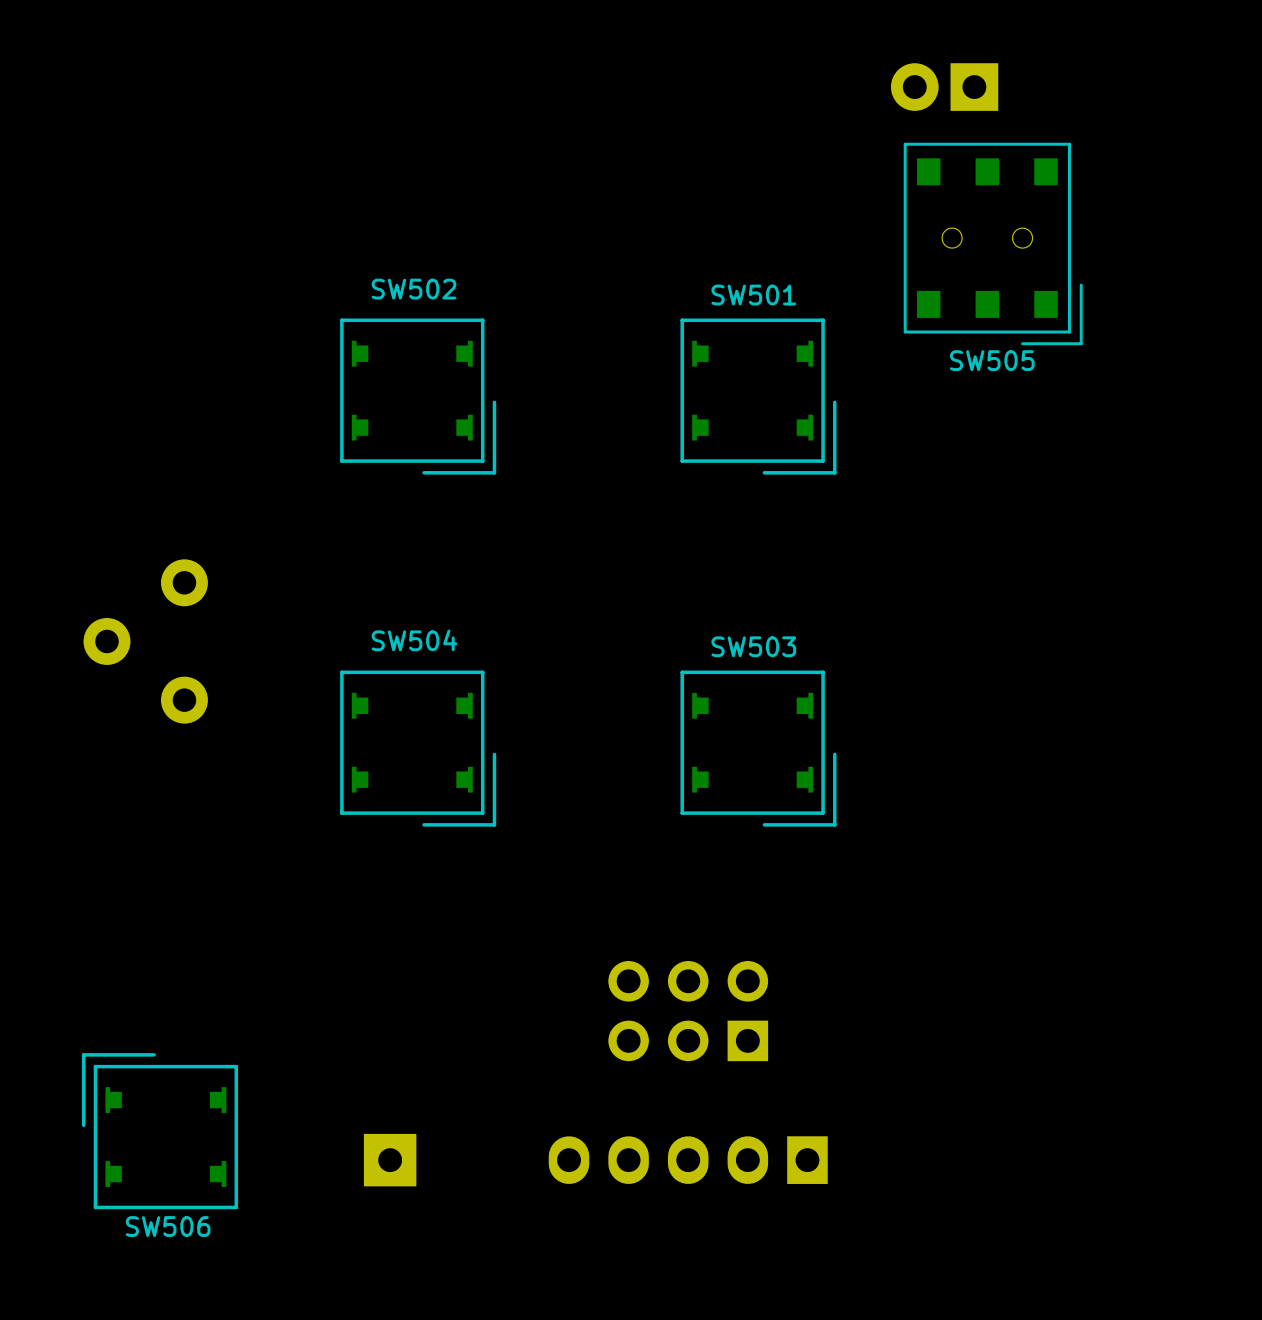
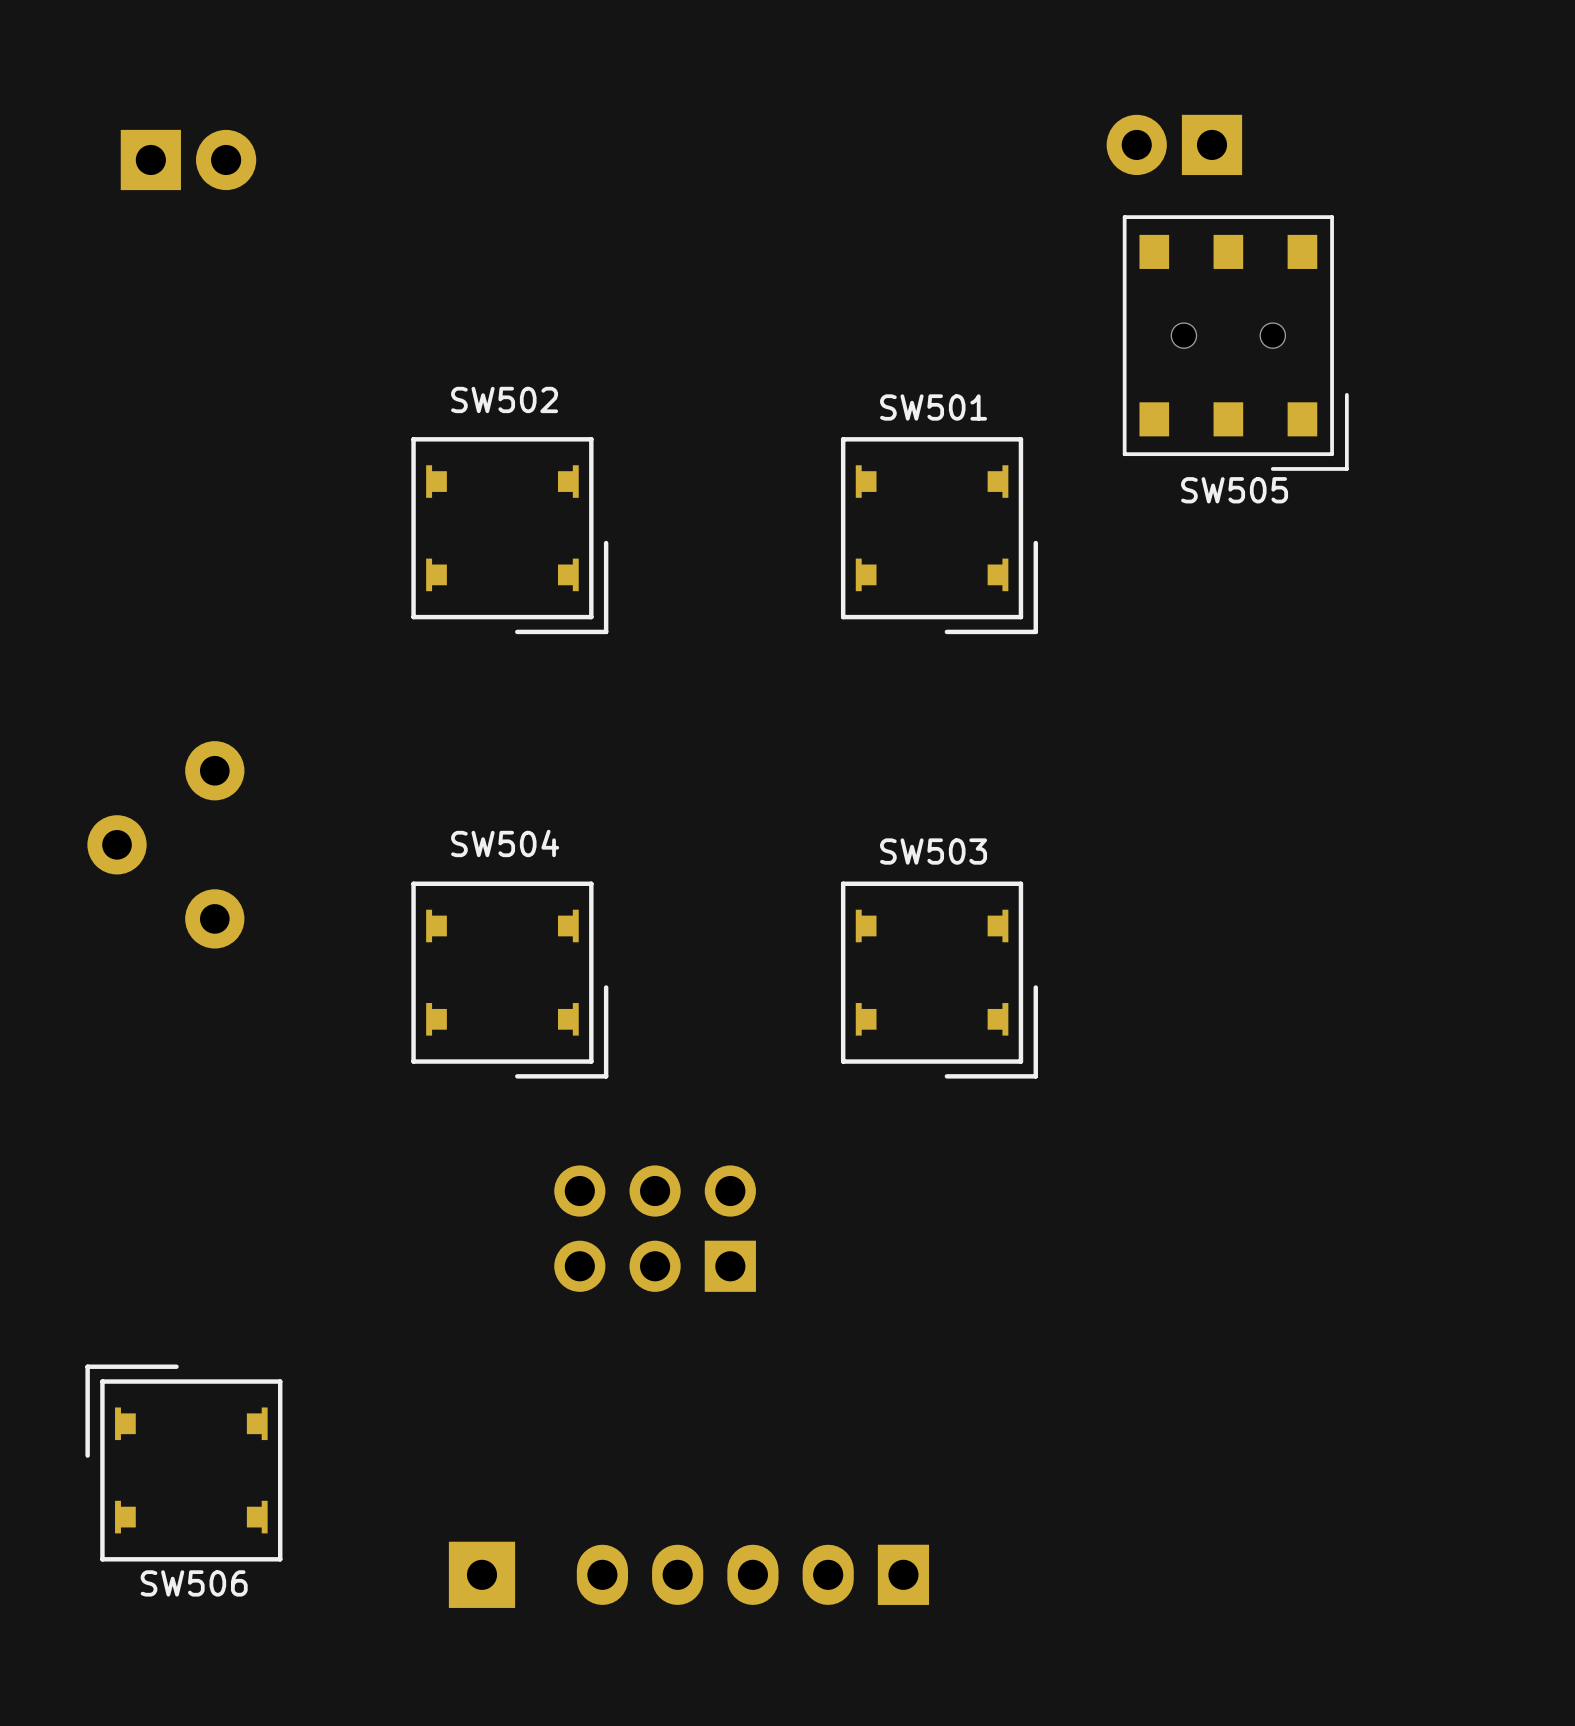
part: none -> (188, 159)
part position: (688, 1011) -> (655, 1228)
part position: (390, 1160) -> (481, 1574)
part position: (688, 1160) -> (752, 1574)

